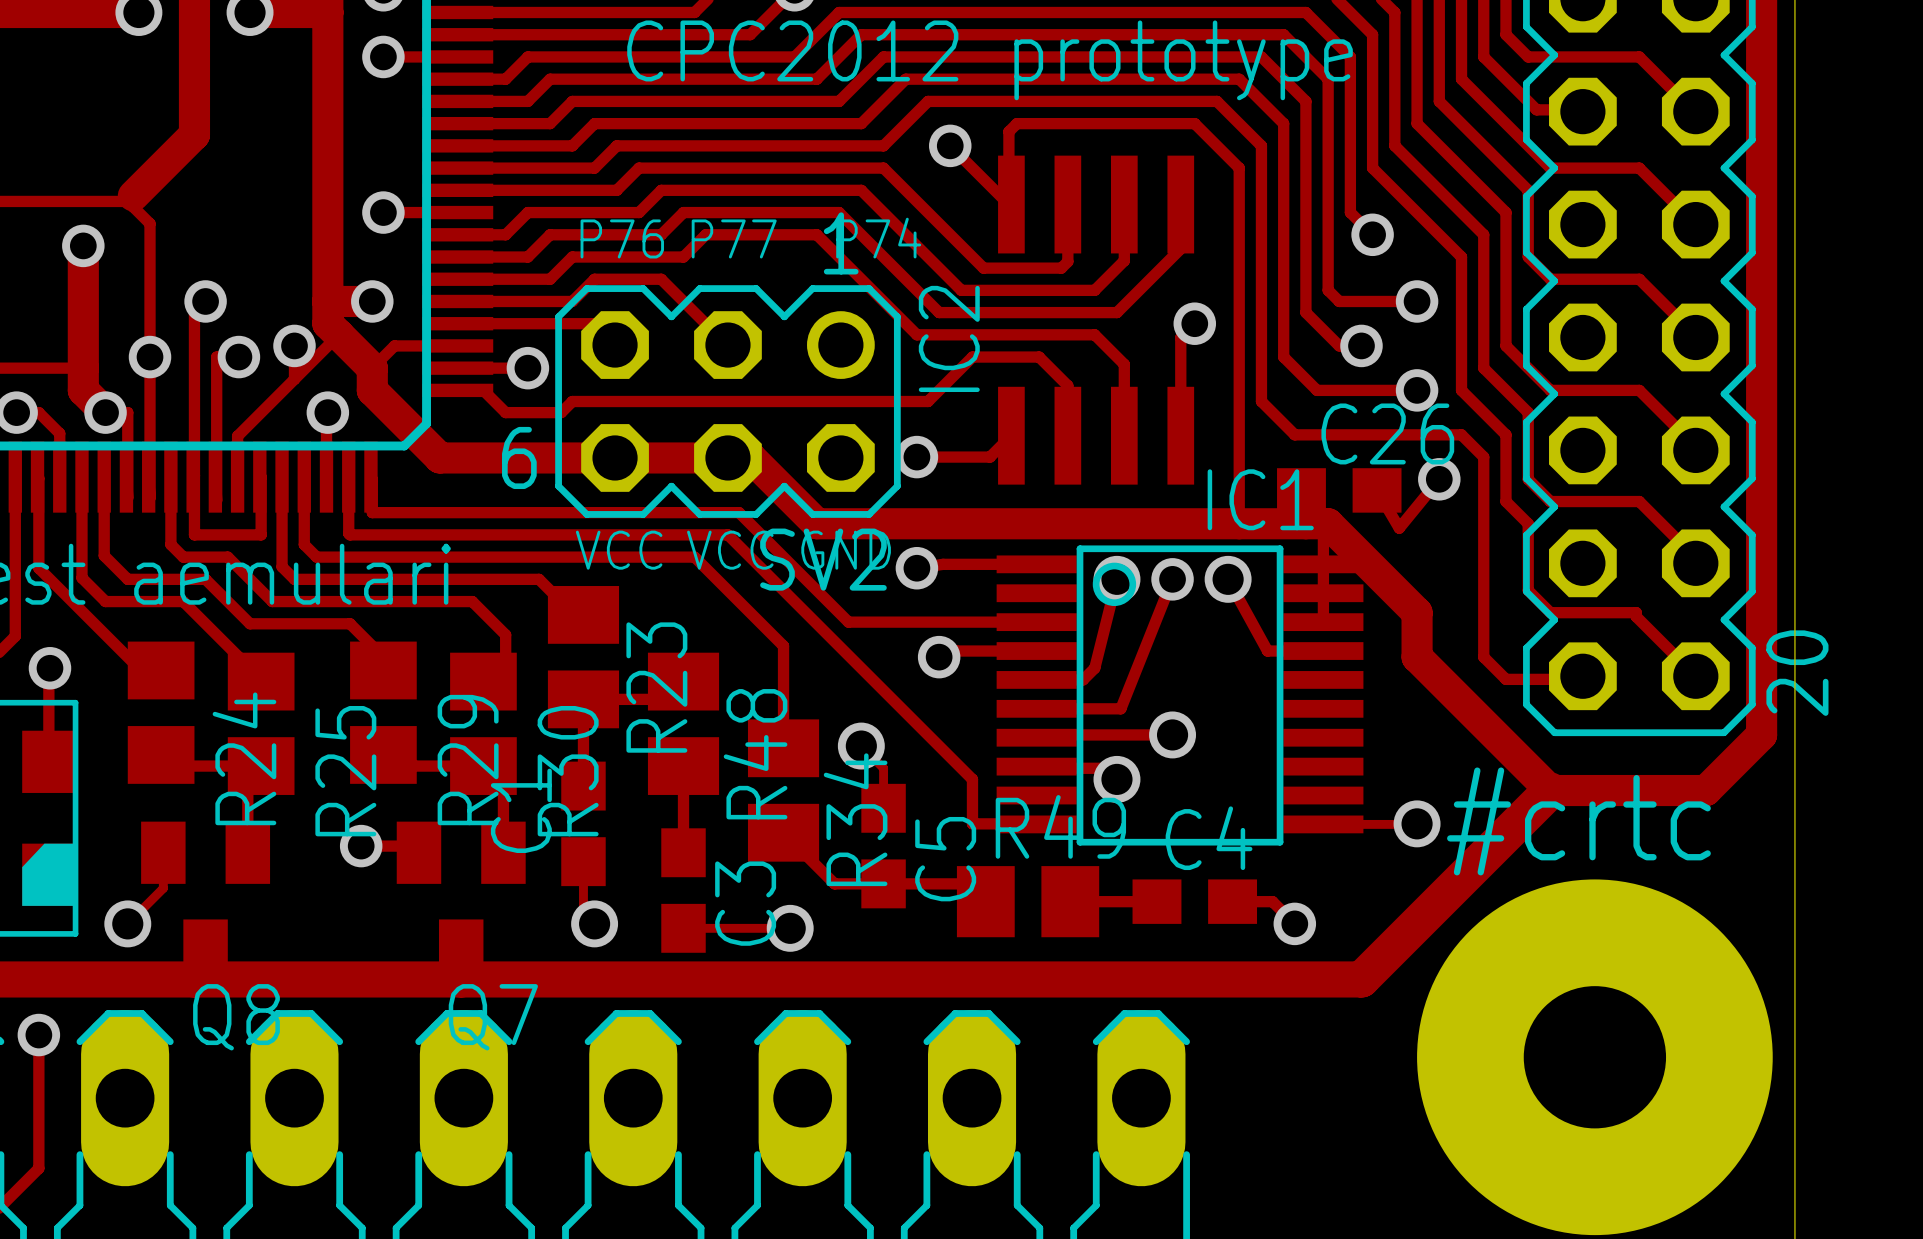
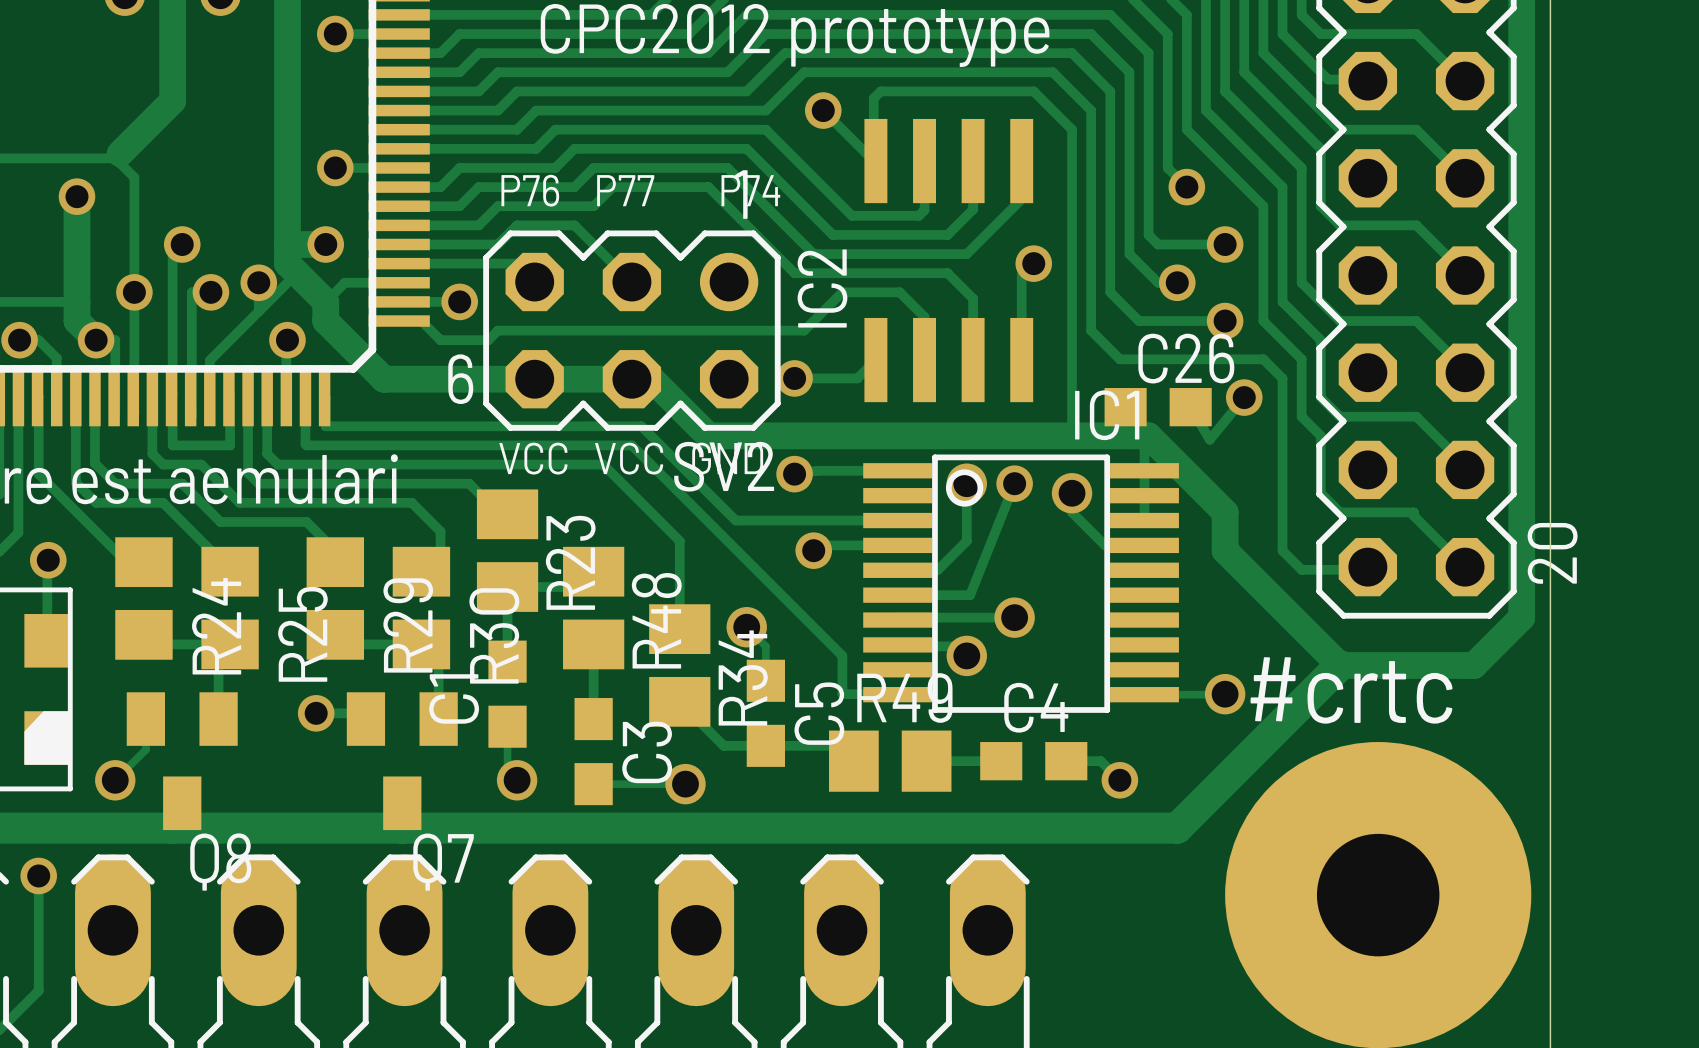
track: (1116, 579) (1094, 668) -> (966, 493) (966, 541) (947, 560)
track: (1228, 579) (1267, 651) (1277, 651) -> (1072, 493) (1072, 512) (1105, 545)
via position: (1228, 579) -> (1072, 493)

